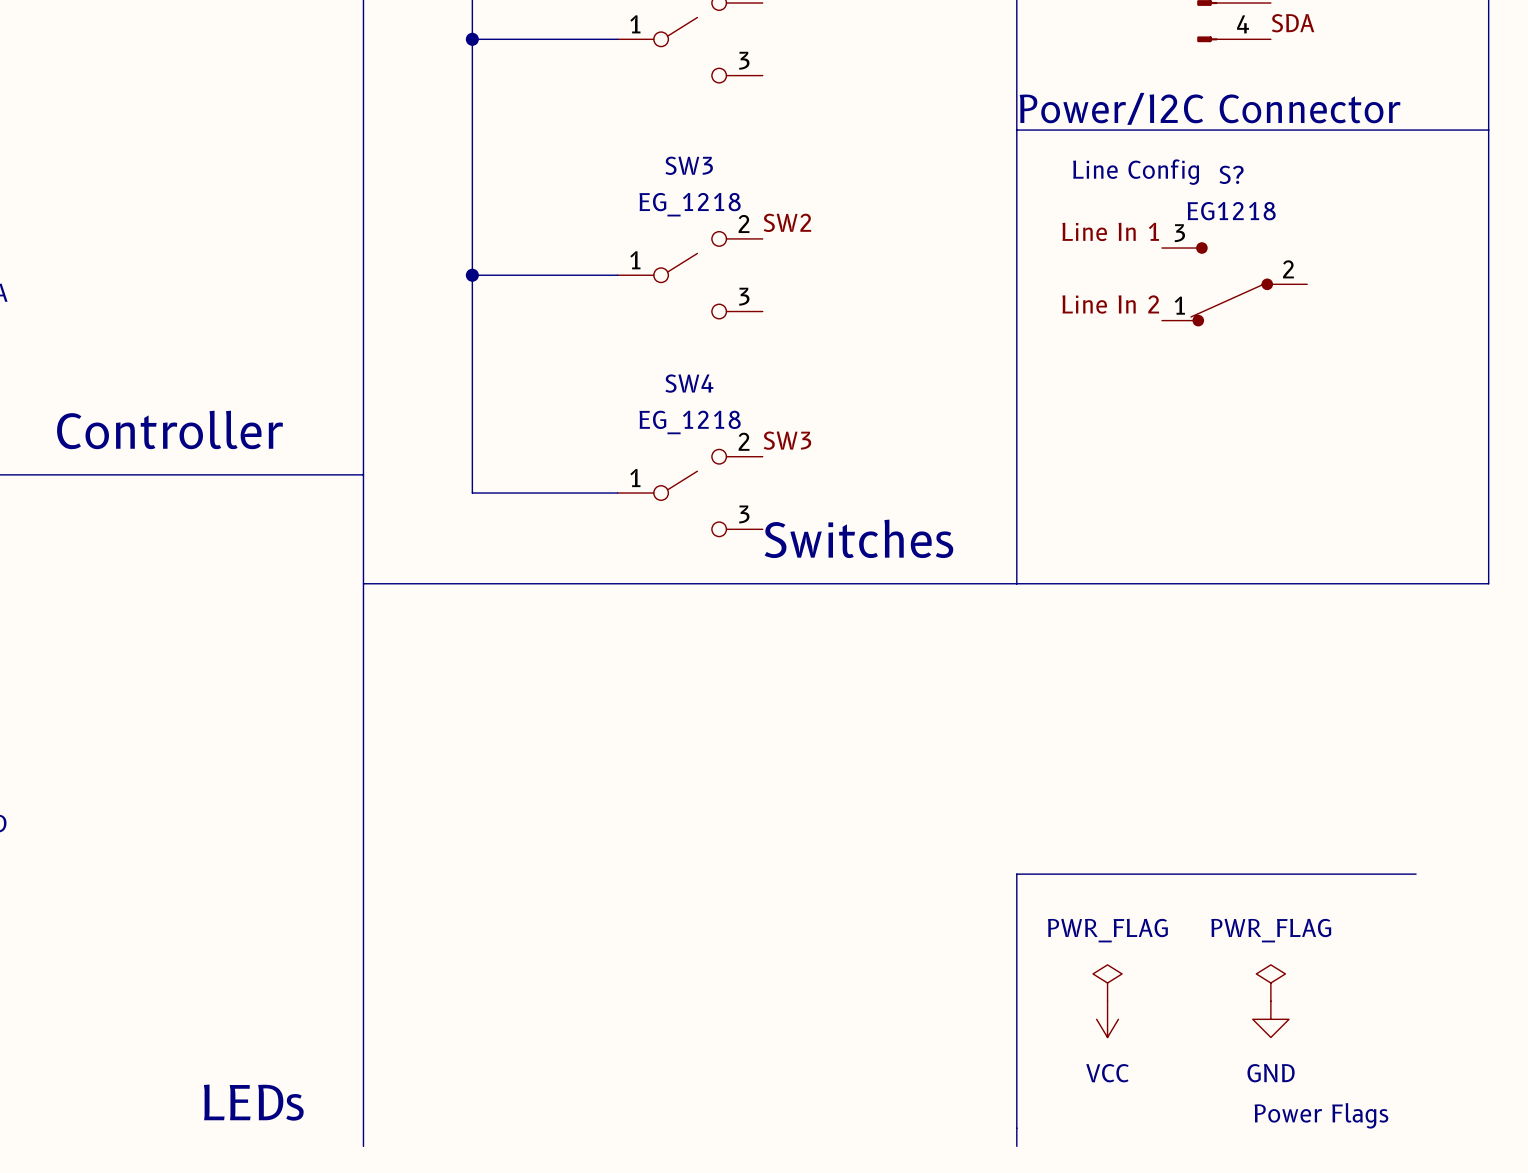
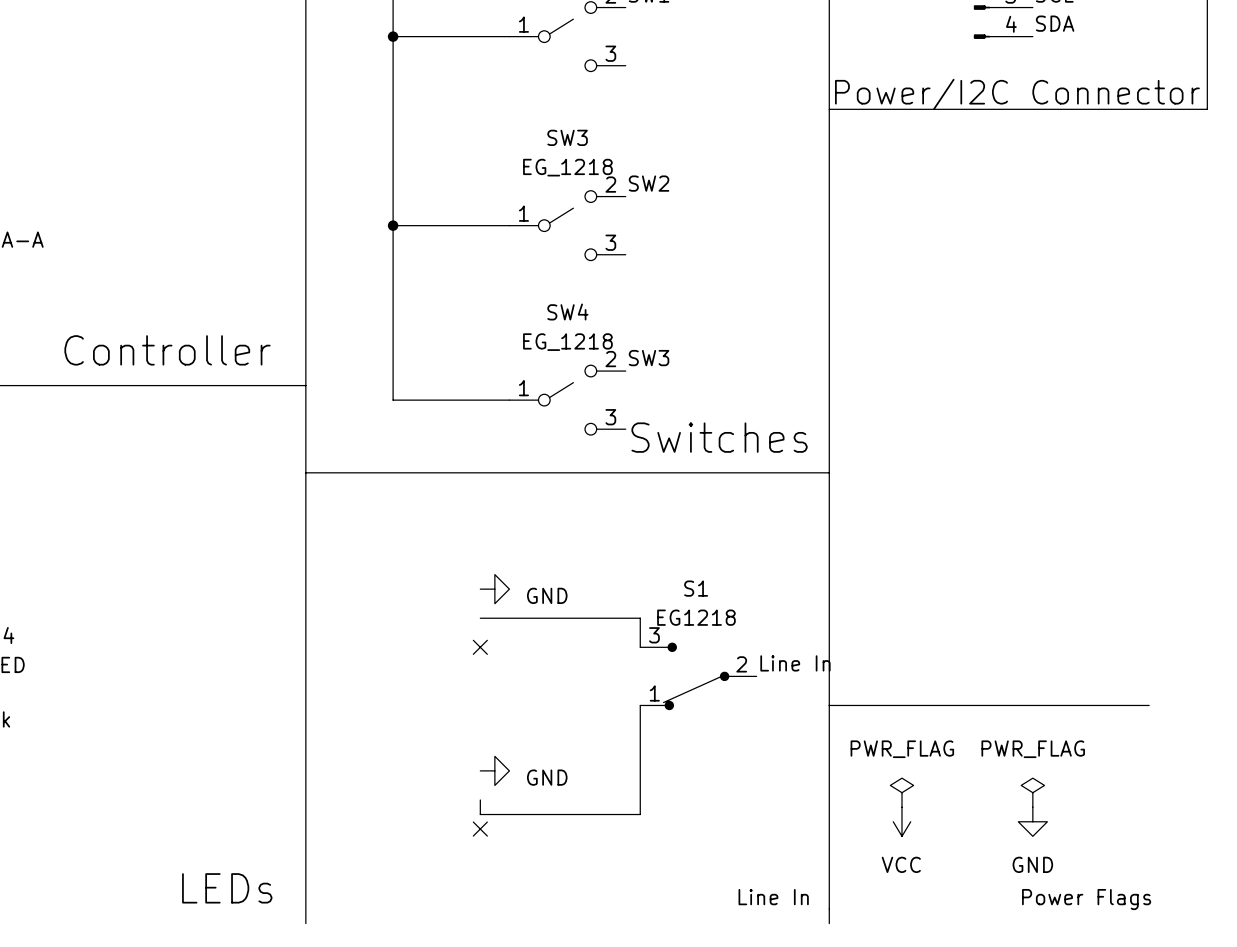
line: (1488, 130) (1488, 583) (1016, 583) -> (829, 705) (829, 472)
text: Line Config (1136, 172) -> none
label: Line In 1 (1110, 231) -> none
S?: EG1218 (1234, 284) -> none
label: Line In 2 (1110, 304) -> none
power symbol: none -> GND (494, 589)
wire: none -> (480, 618) (640, 618) (640, 647)
no-connect mark: none -> (480, 647)
label: none -> Line In (795, 663)
S1: none -> EG1218 (698, 676)
wire: none -> (640, 705) (640, 814) (480, 814) (480, 799)
power symbol: none -> GND (494, 770)
no-connect mark: none -> (480, 829)
text: none -> Line In (773, 897)

